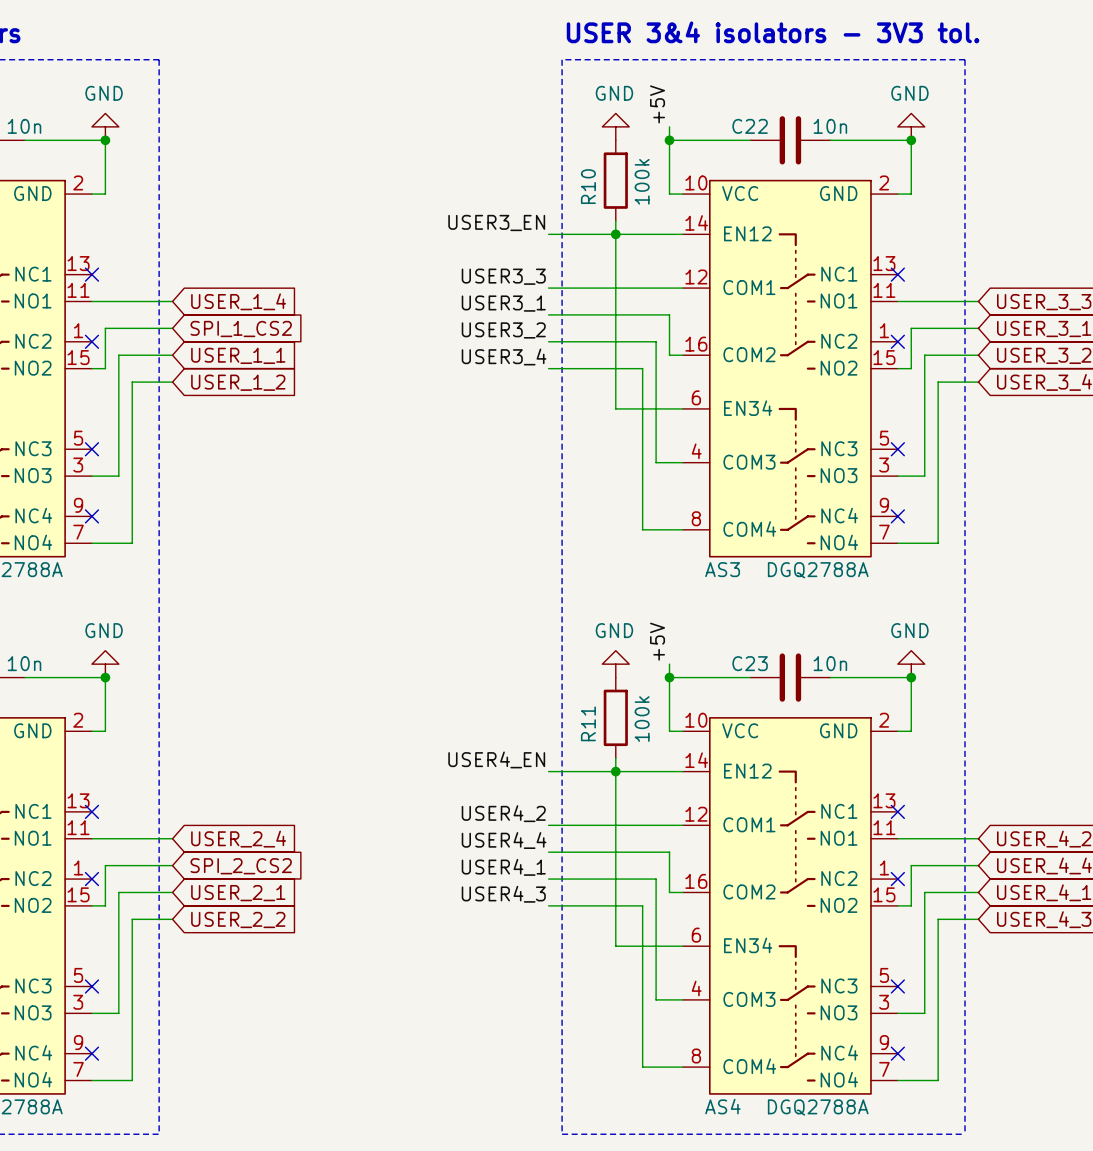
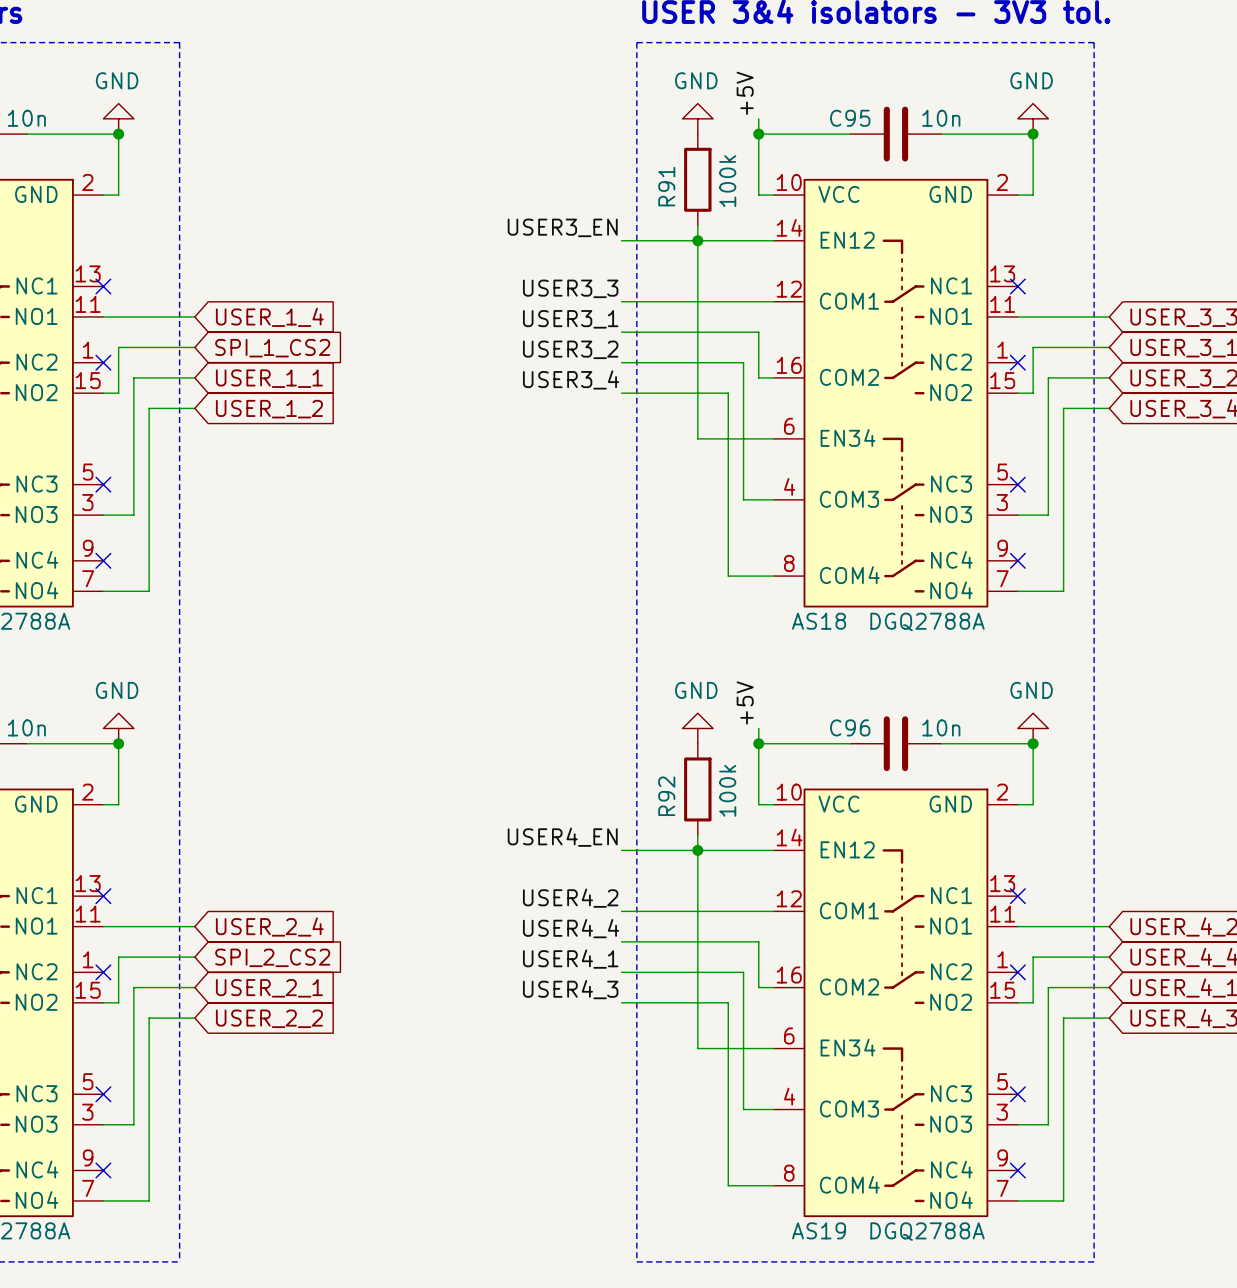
C22 name: C22 (750, 126) -> C95 (850, 118)
R10 name: R10 (588, 186) -> R91 (666, 186)
AS3 name: AS3 (722, 569) -> AS18 (819, 621)
C23 name: C23 (750, 663) -> C96 (850, 727)
R11 name: R11 (588, 723) -> R92 (666, 796)
AS4 name: AS4 (722, 1106) -> AS19 (819, 1230)

